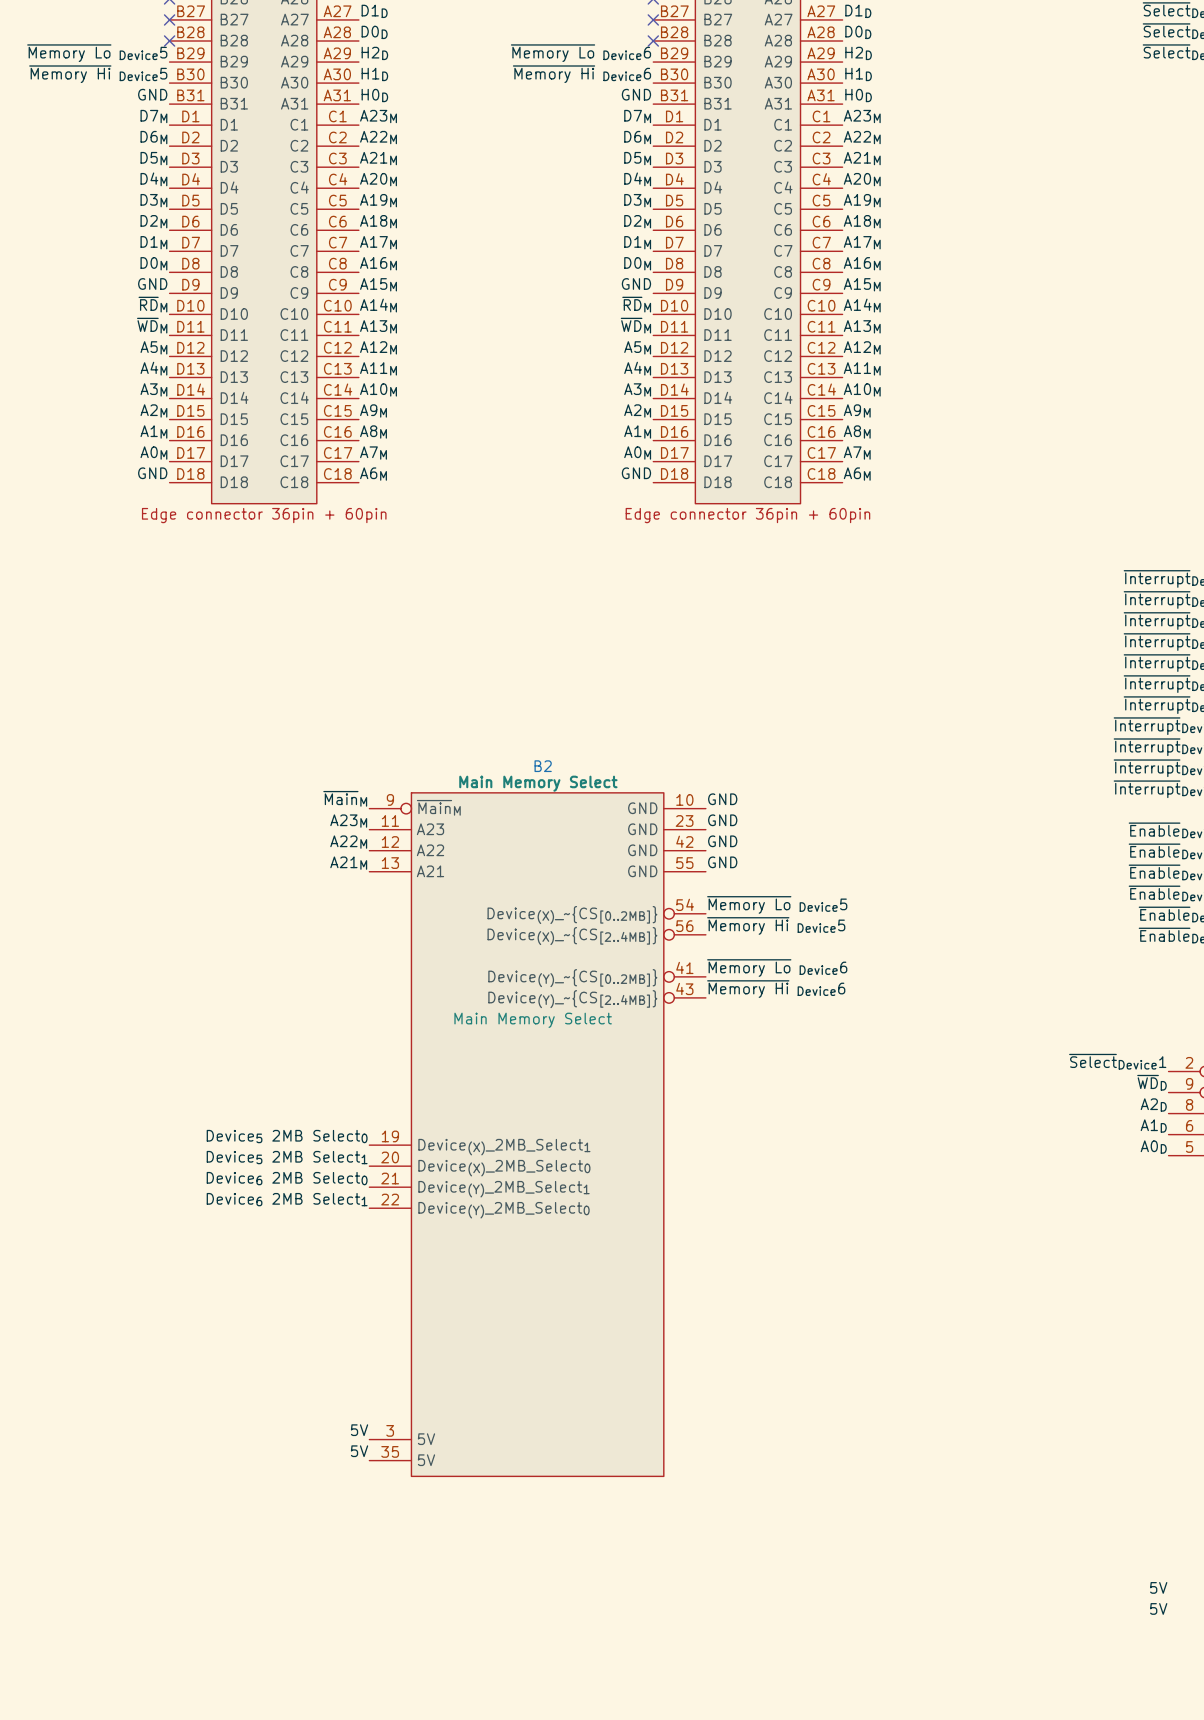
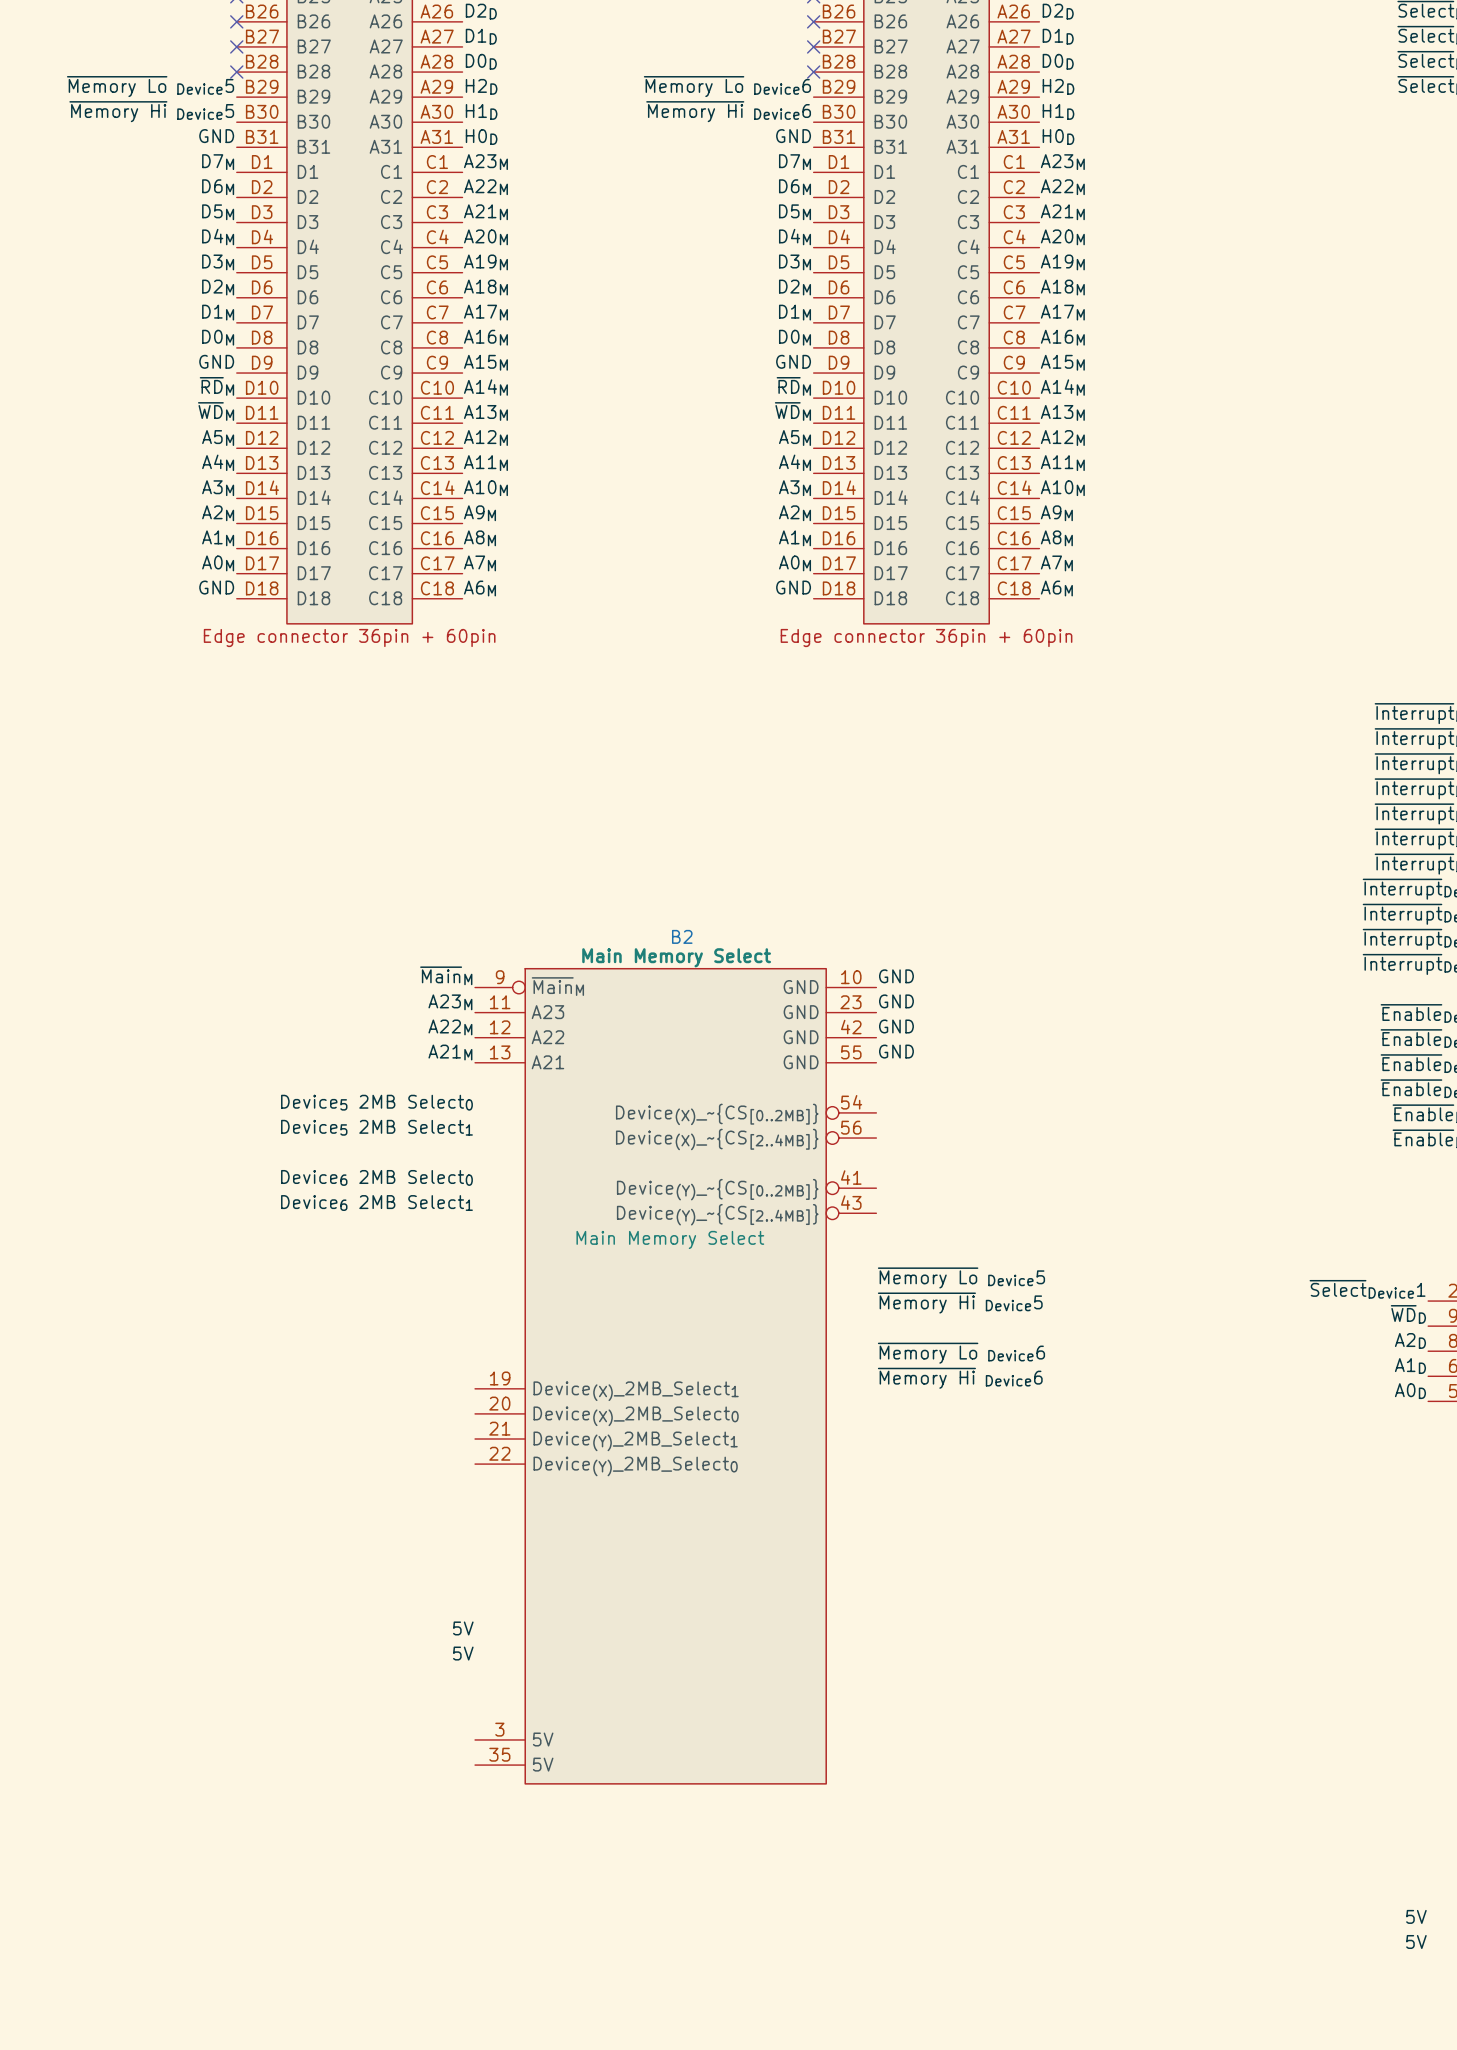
label position: ~{Memory Lo} Device5 (777, 904) -> ~{Memory Lo} Device5 (961, 1277)
label: none -> Device5 2MB Select0 (376, 1102)
label position: ~{Memory Hi} Device5 (776, 925) -> ~{Memory Hi} Device5 (960, 1303)
label: none -> Device5 2MB Select1 (376, 1127)
label: none -> Device6 2MB Select0 (376, 1177)
label position: ~{Memory Lo} Device6 (777, 968) -> ~{Memory Lo} Device6 (961, 1353)
label: none -> Device6 2MB Select1 (376, 1203)
label position: ~{Memory Hi} Device6 (776, 989) -> ~{Memory Hi} Device6 (960, 1378)
label: Device5 2MB Select0 (287, 1136) -> none
label: Device5 2MB Select1 (287, 1157) -> none
label: Device6 2MB Select0 (287, 1178) -> none
label: Device6 2MB Select1 (287, 1199) -> none
label: none -> 5V (463, 1628)
label: none -> 5V (463, 1653)
label: 5V (359, 1430) -> none
label: 5V (359, 1451) -> none

